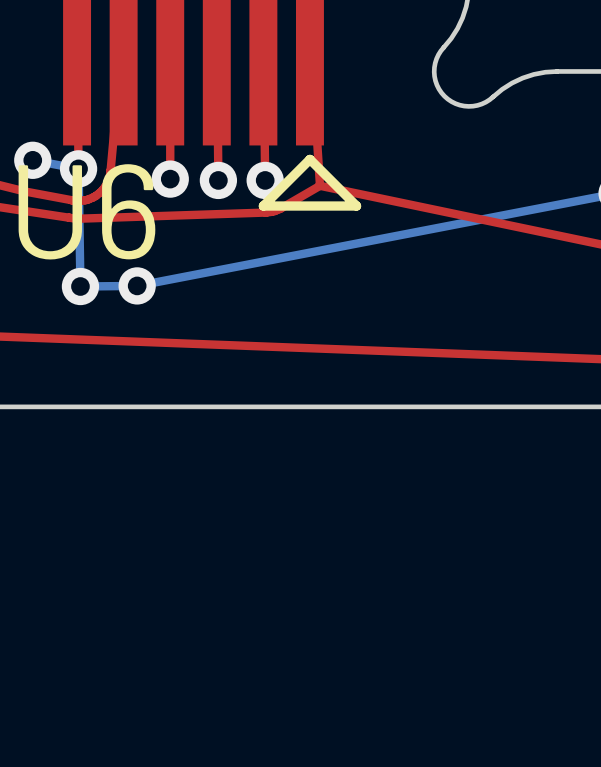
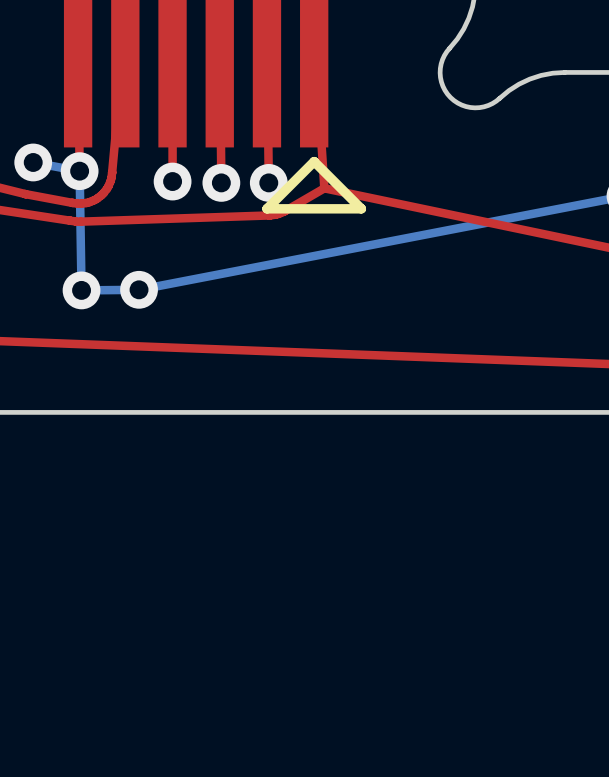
U6 name: U6 (86, 211) -> none

